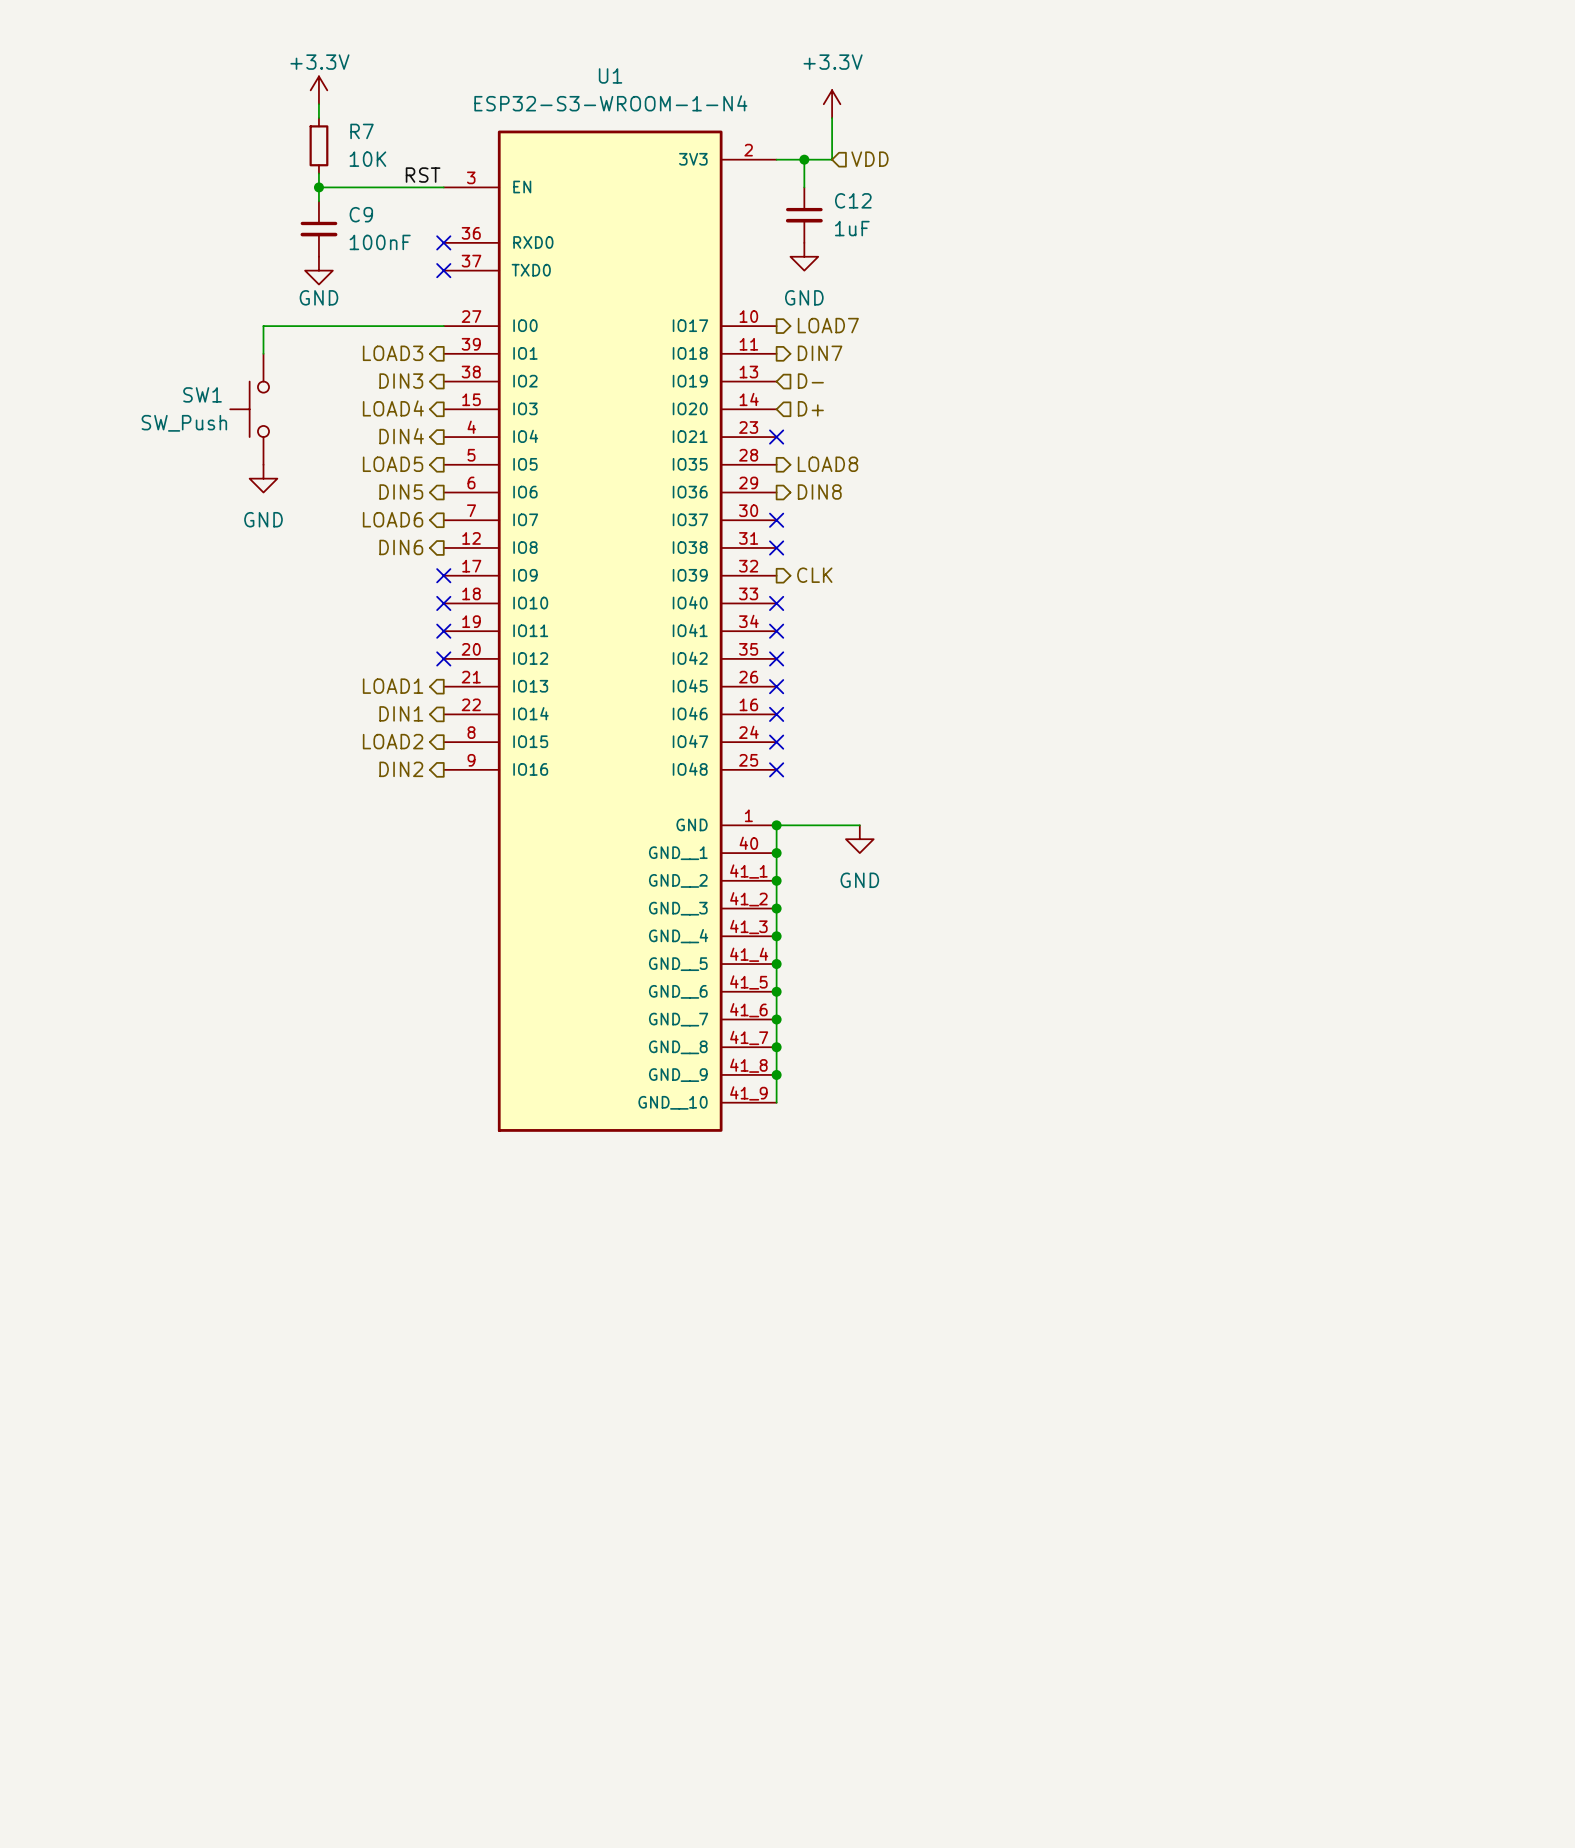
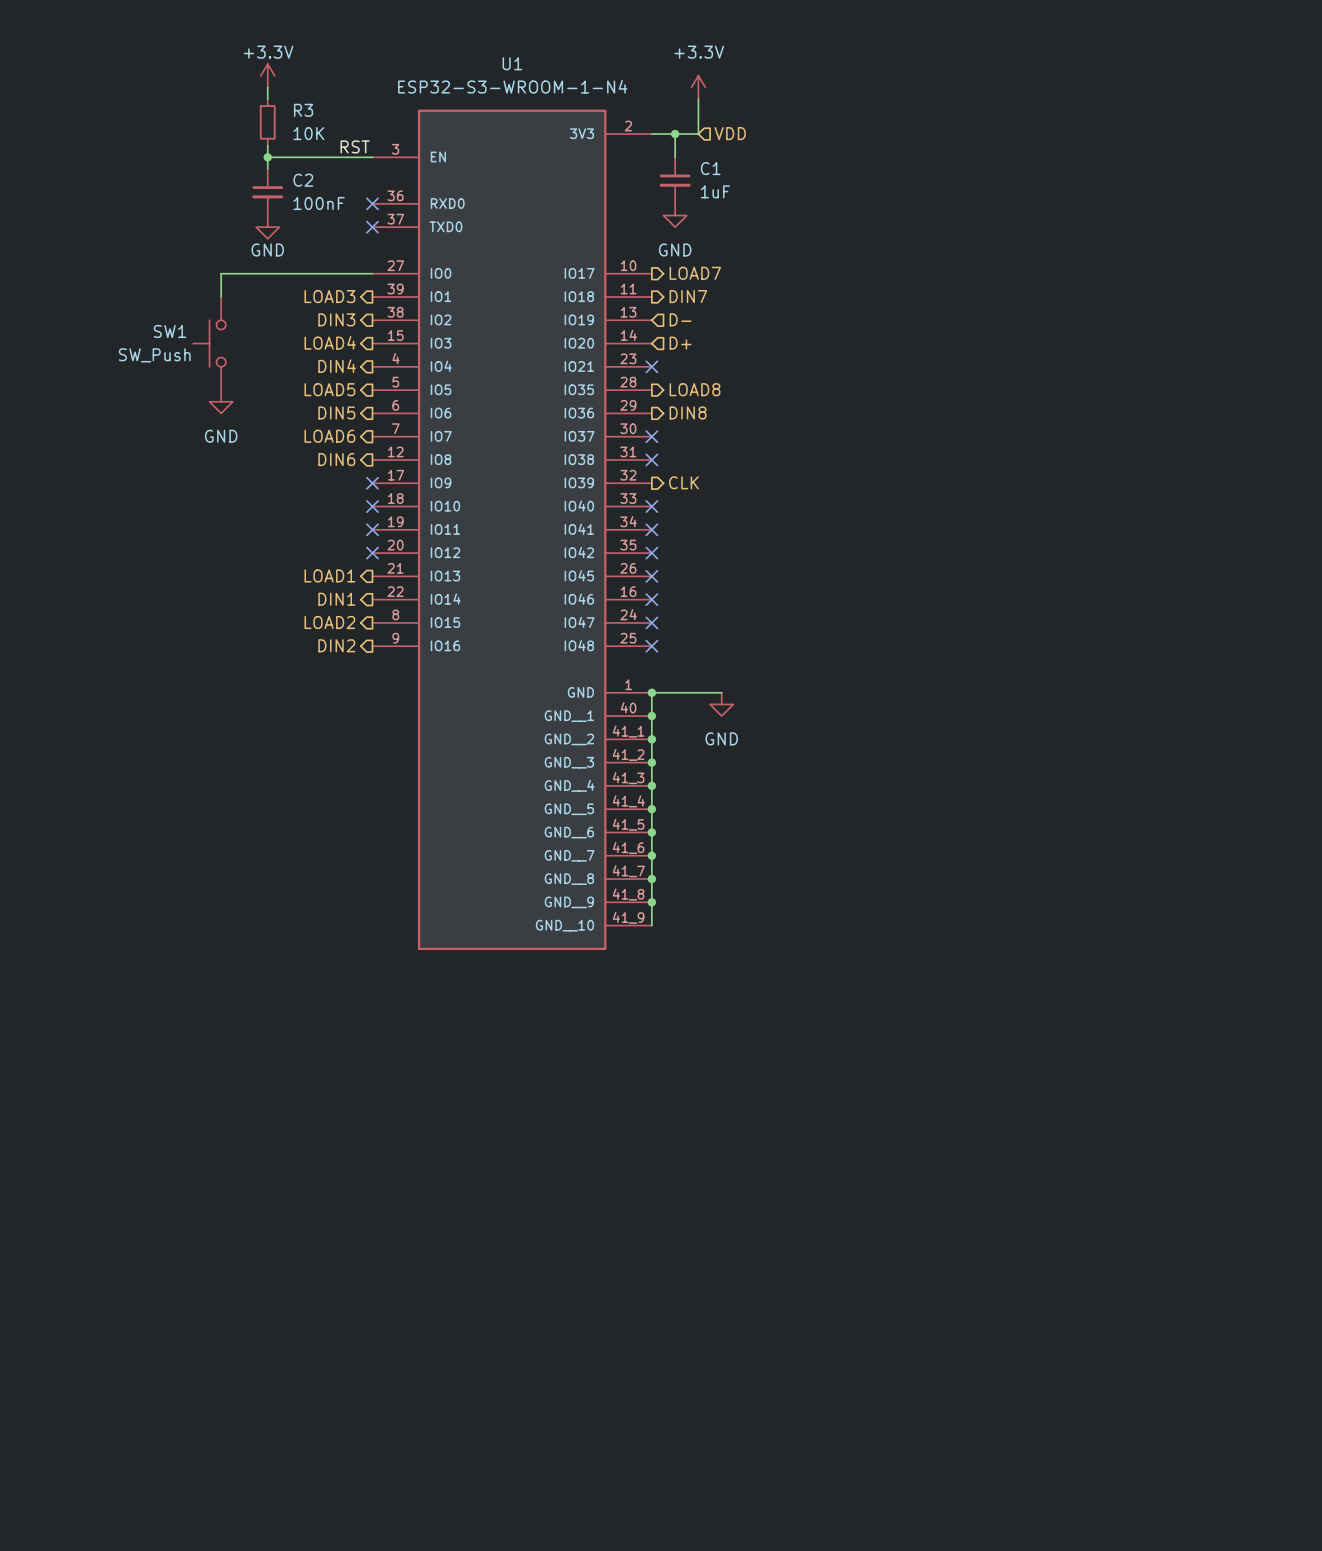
R7 name: R7 (362, 131) -> R3 (303, 110)
C12 name: C12 (853, 200) -> C1 (710, 168)
C9 name: C9 (361, 214) -> C2 (303, 180)

